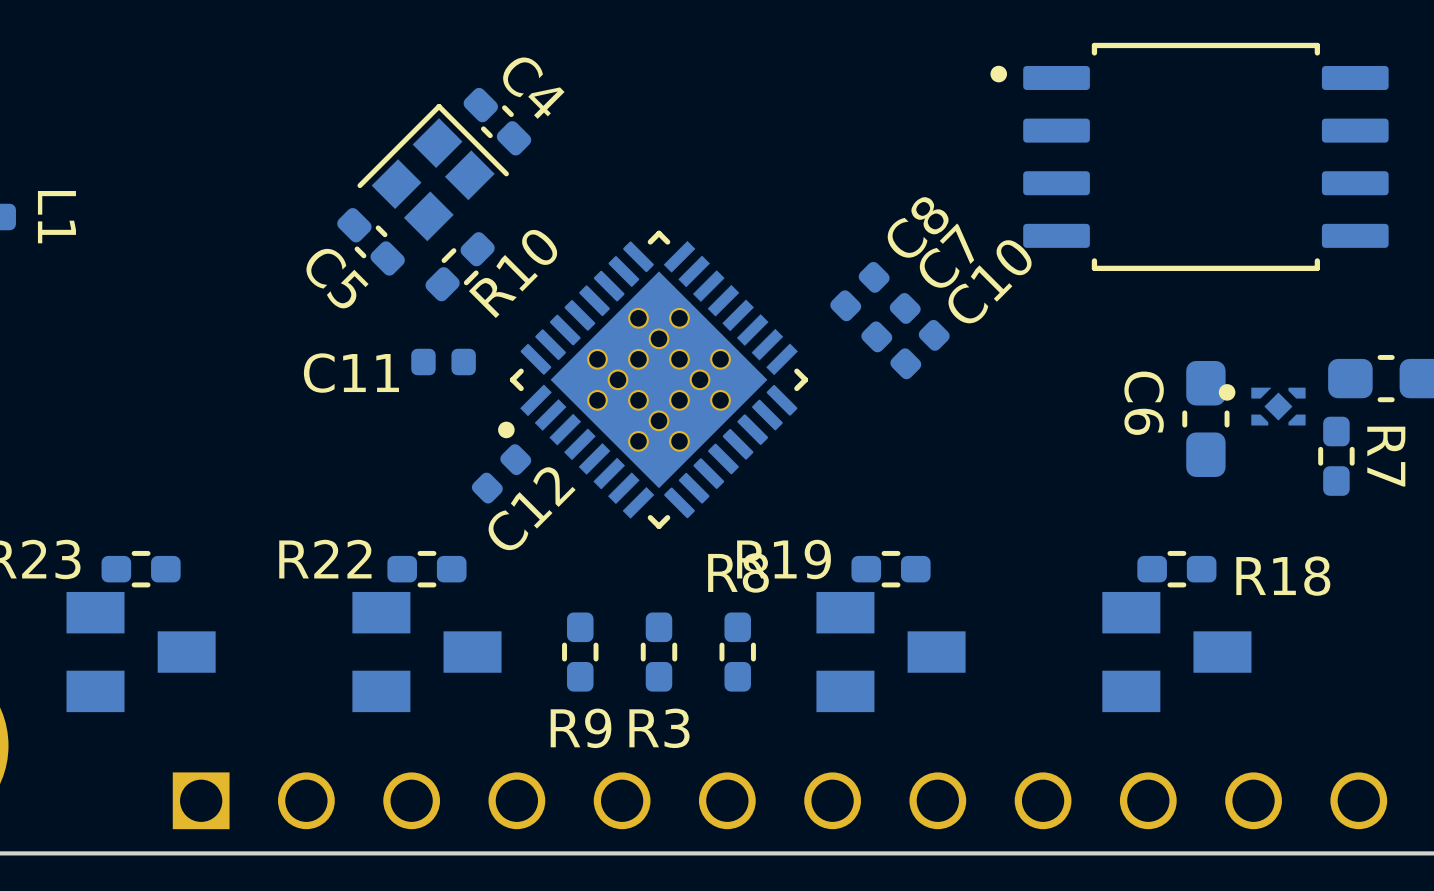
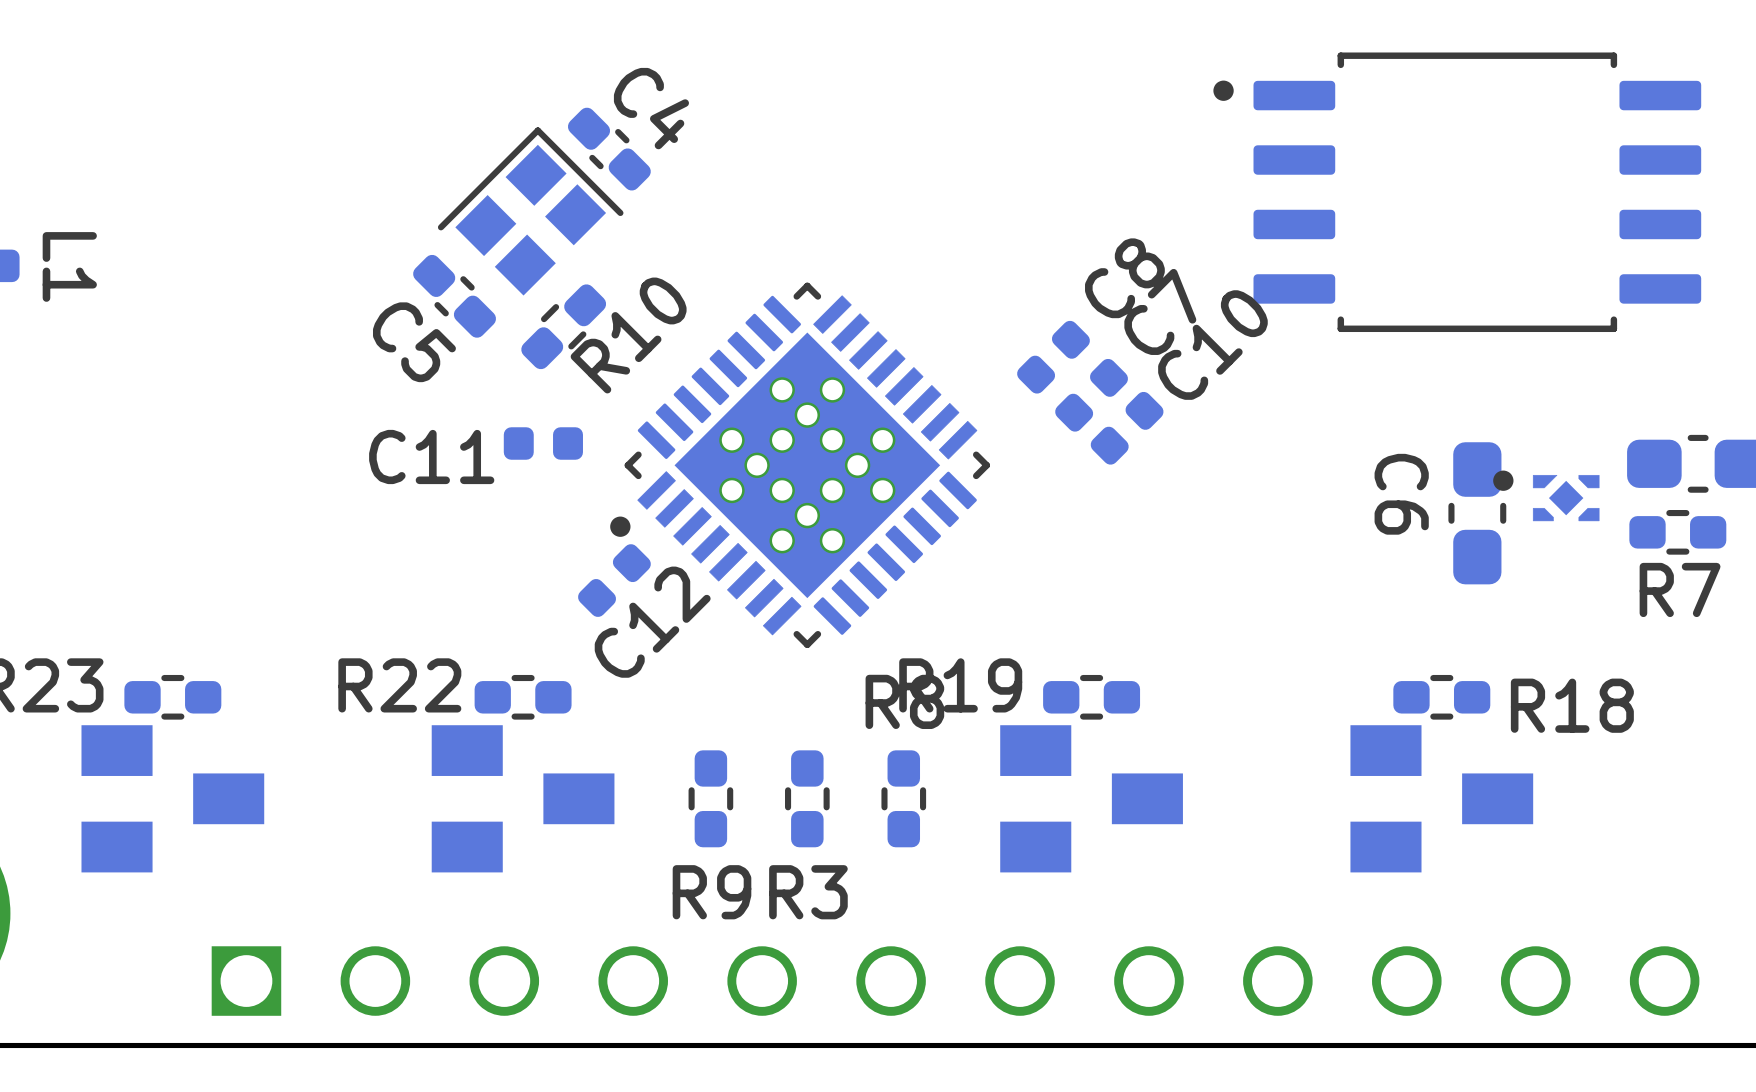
R7 rotation: 0° (1336, 456) -> 90° clockwise (1677, 532)

